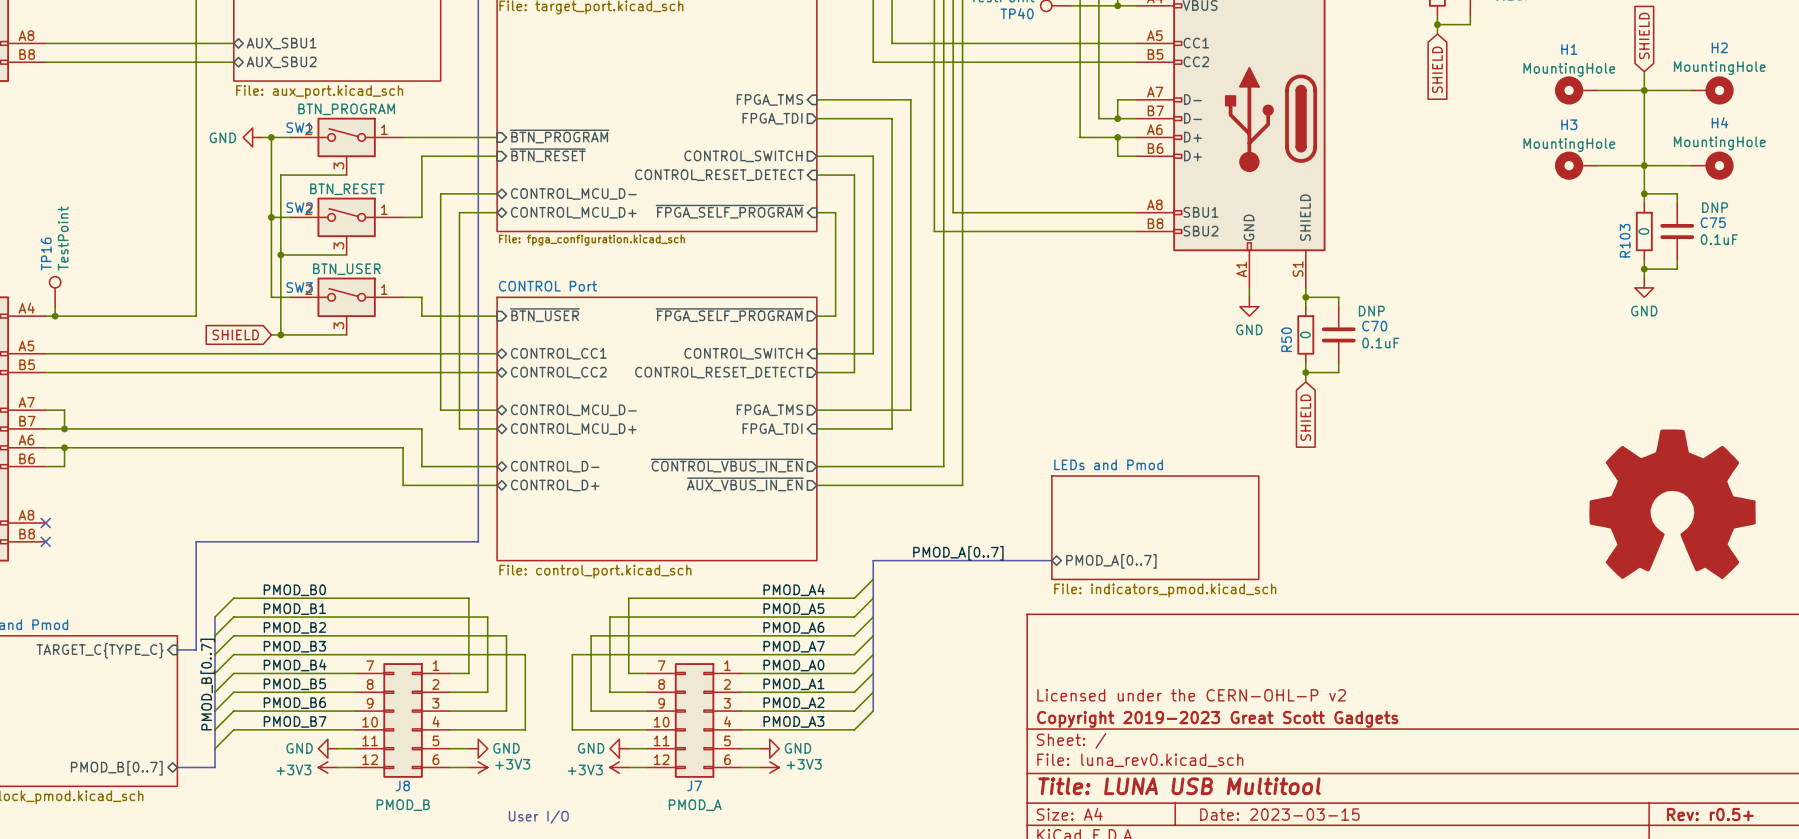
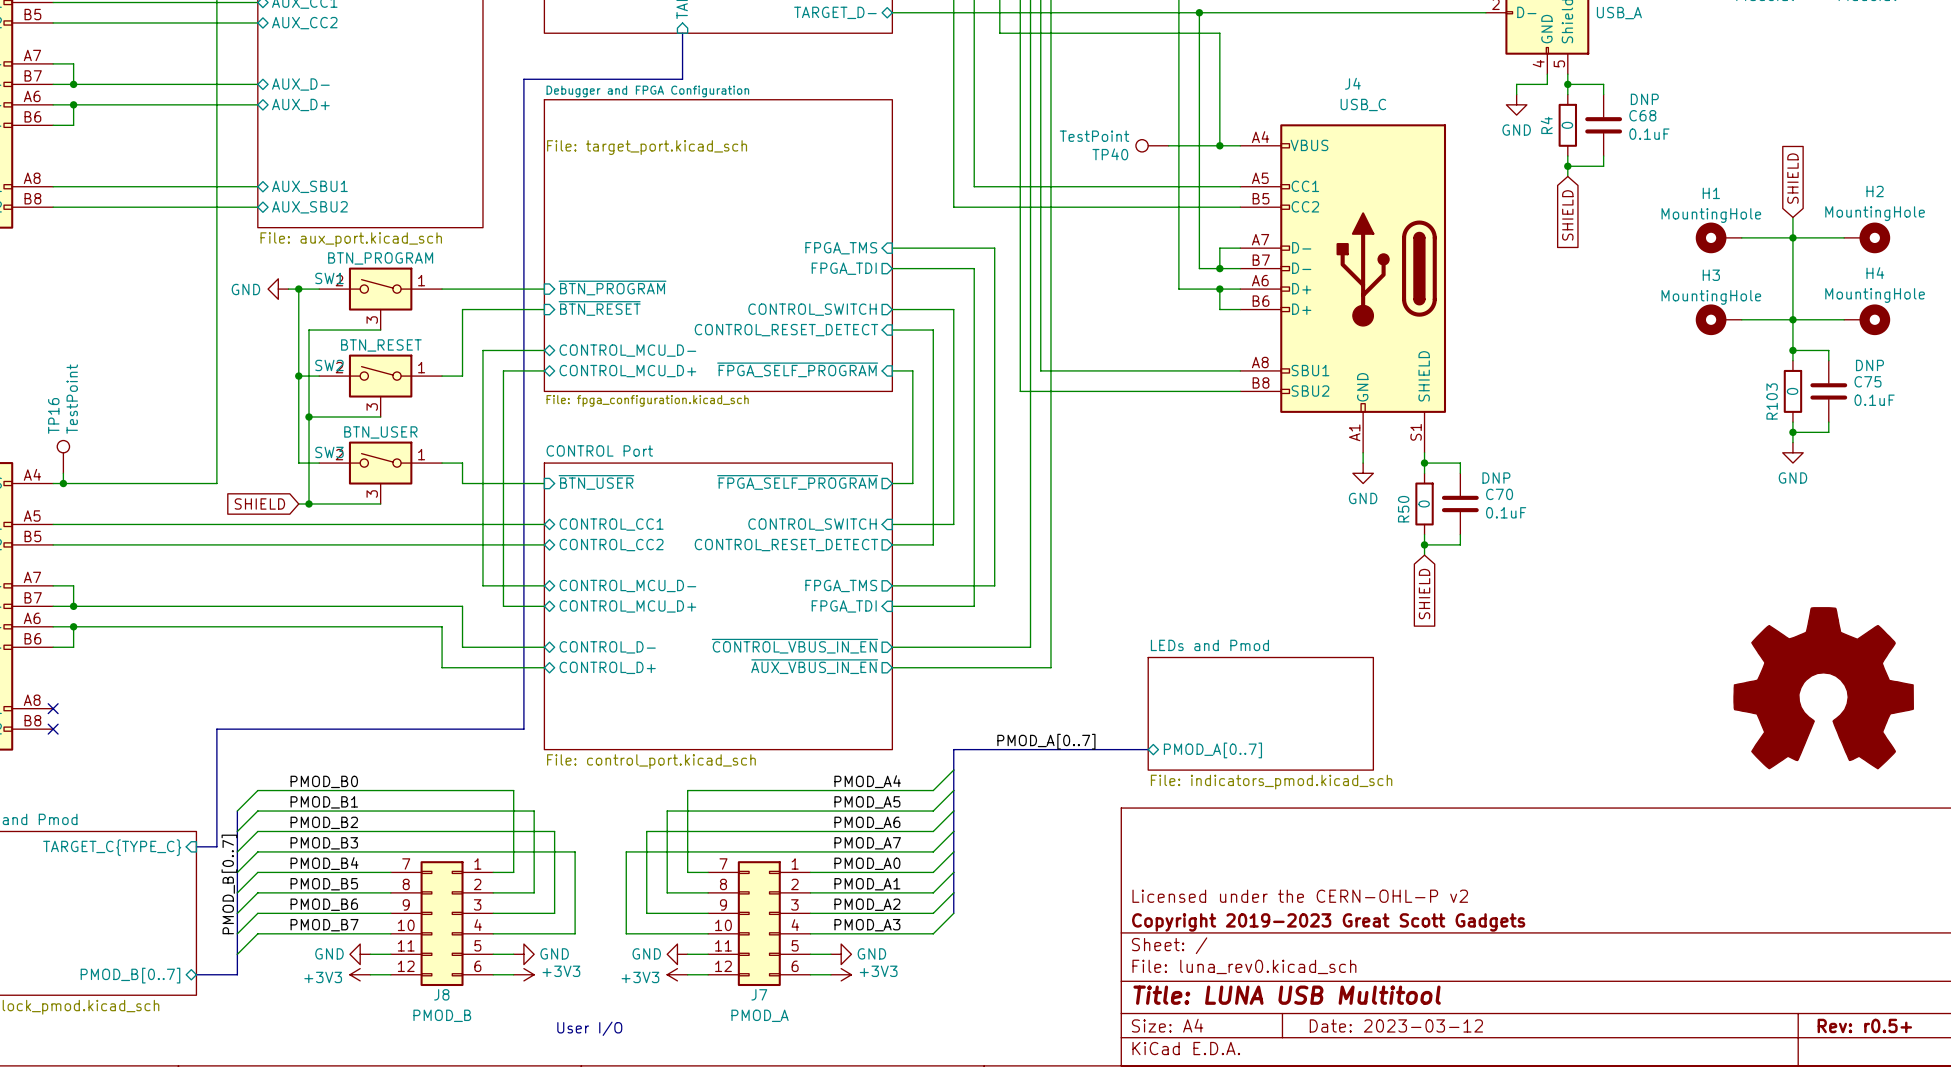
title block: Date: 2023-03-15 (1279, 814) -> Date: 2023-03-12 (1396, 1025)

